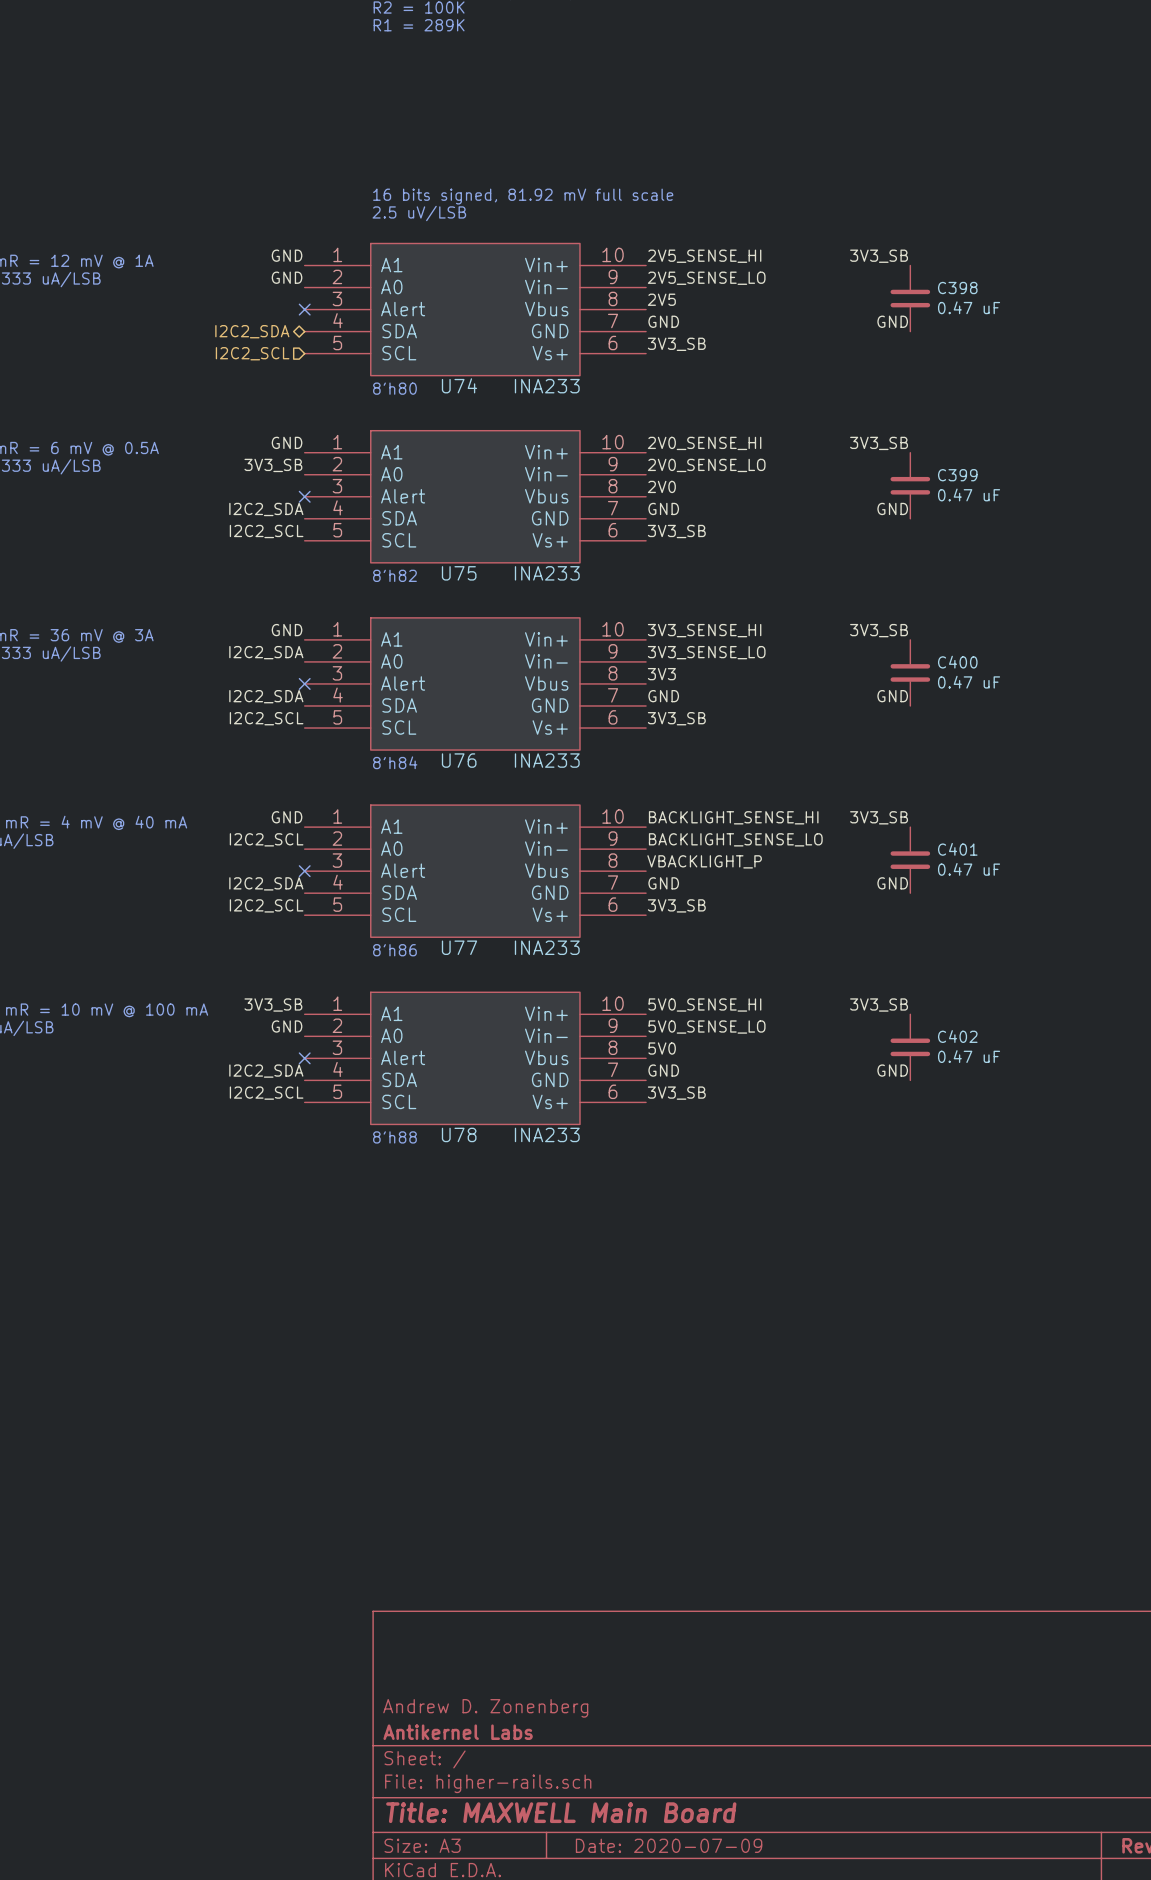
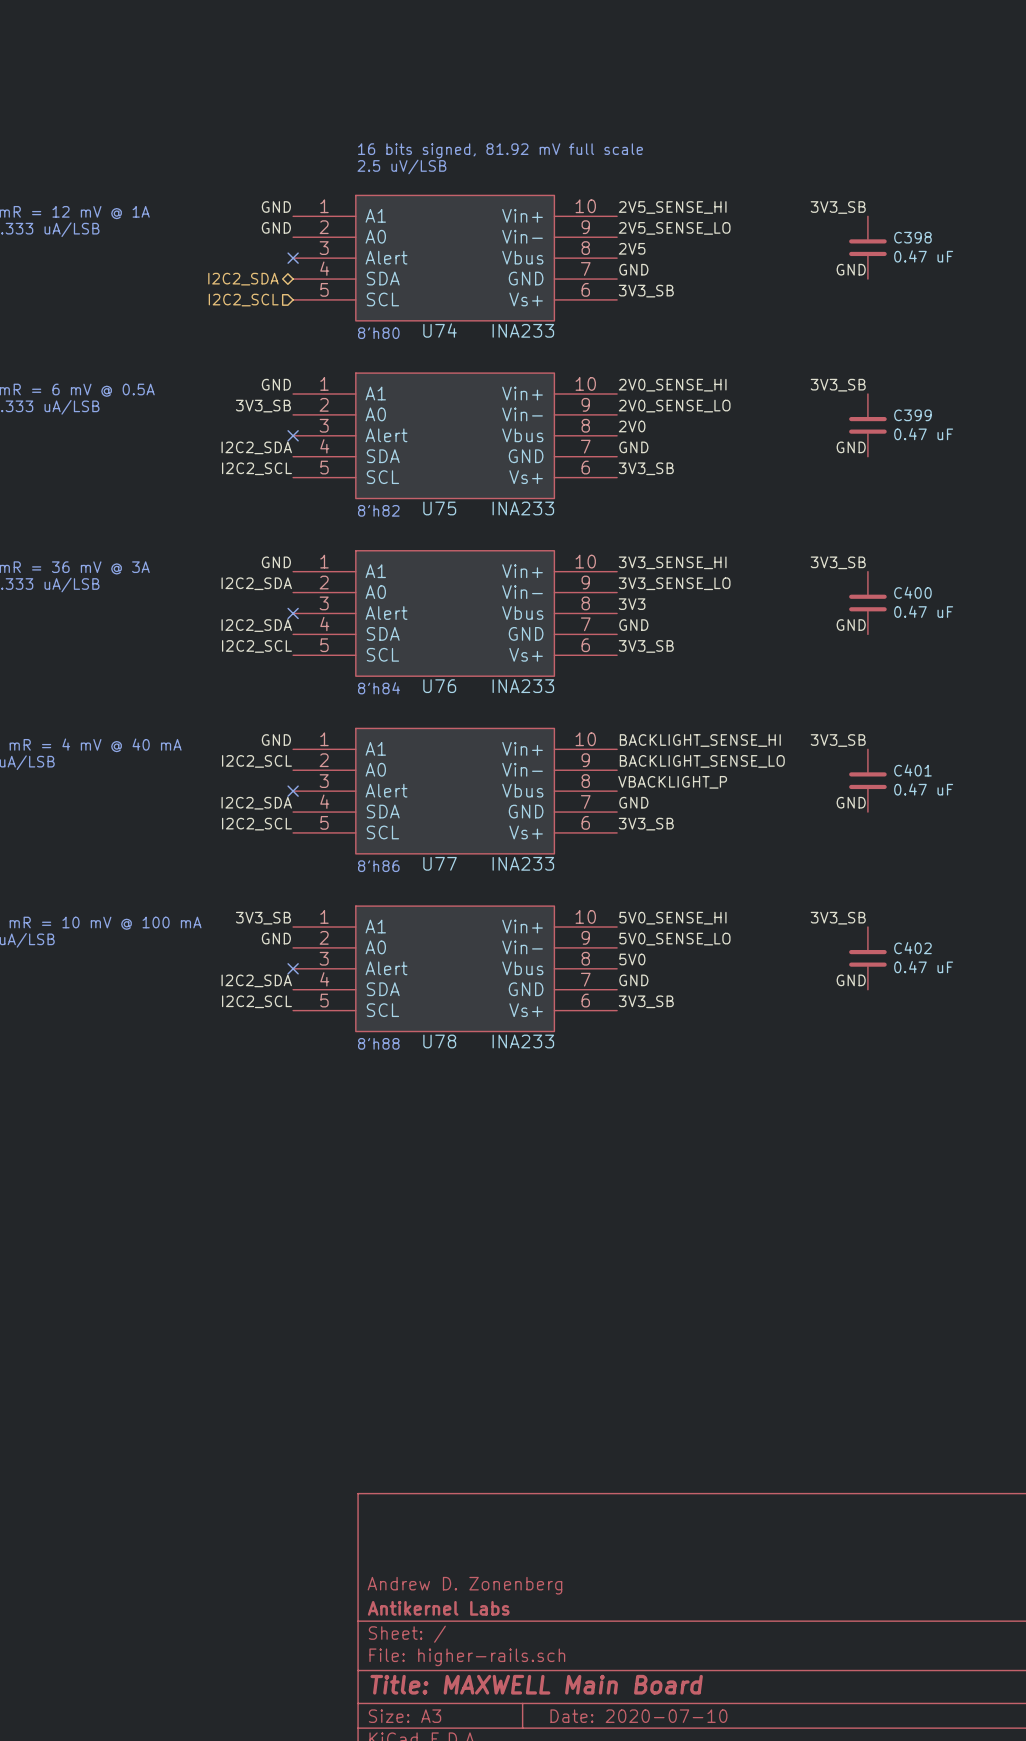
title block: Date: 2020-07-09 (669, 1845) -> Date: 2020-07-10 (638, 1716)

